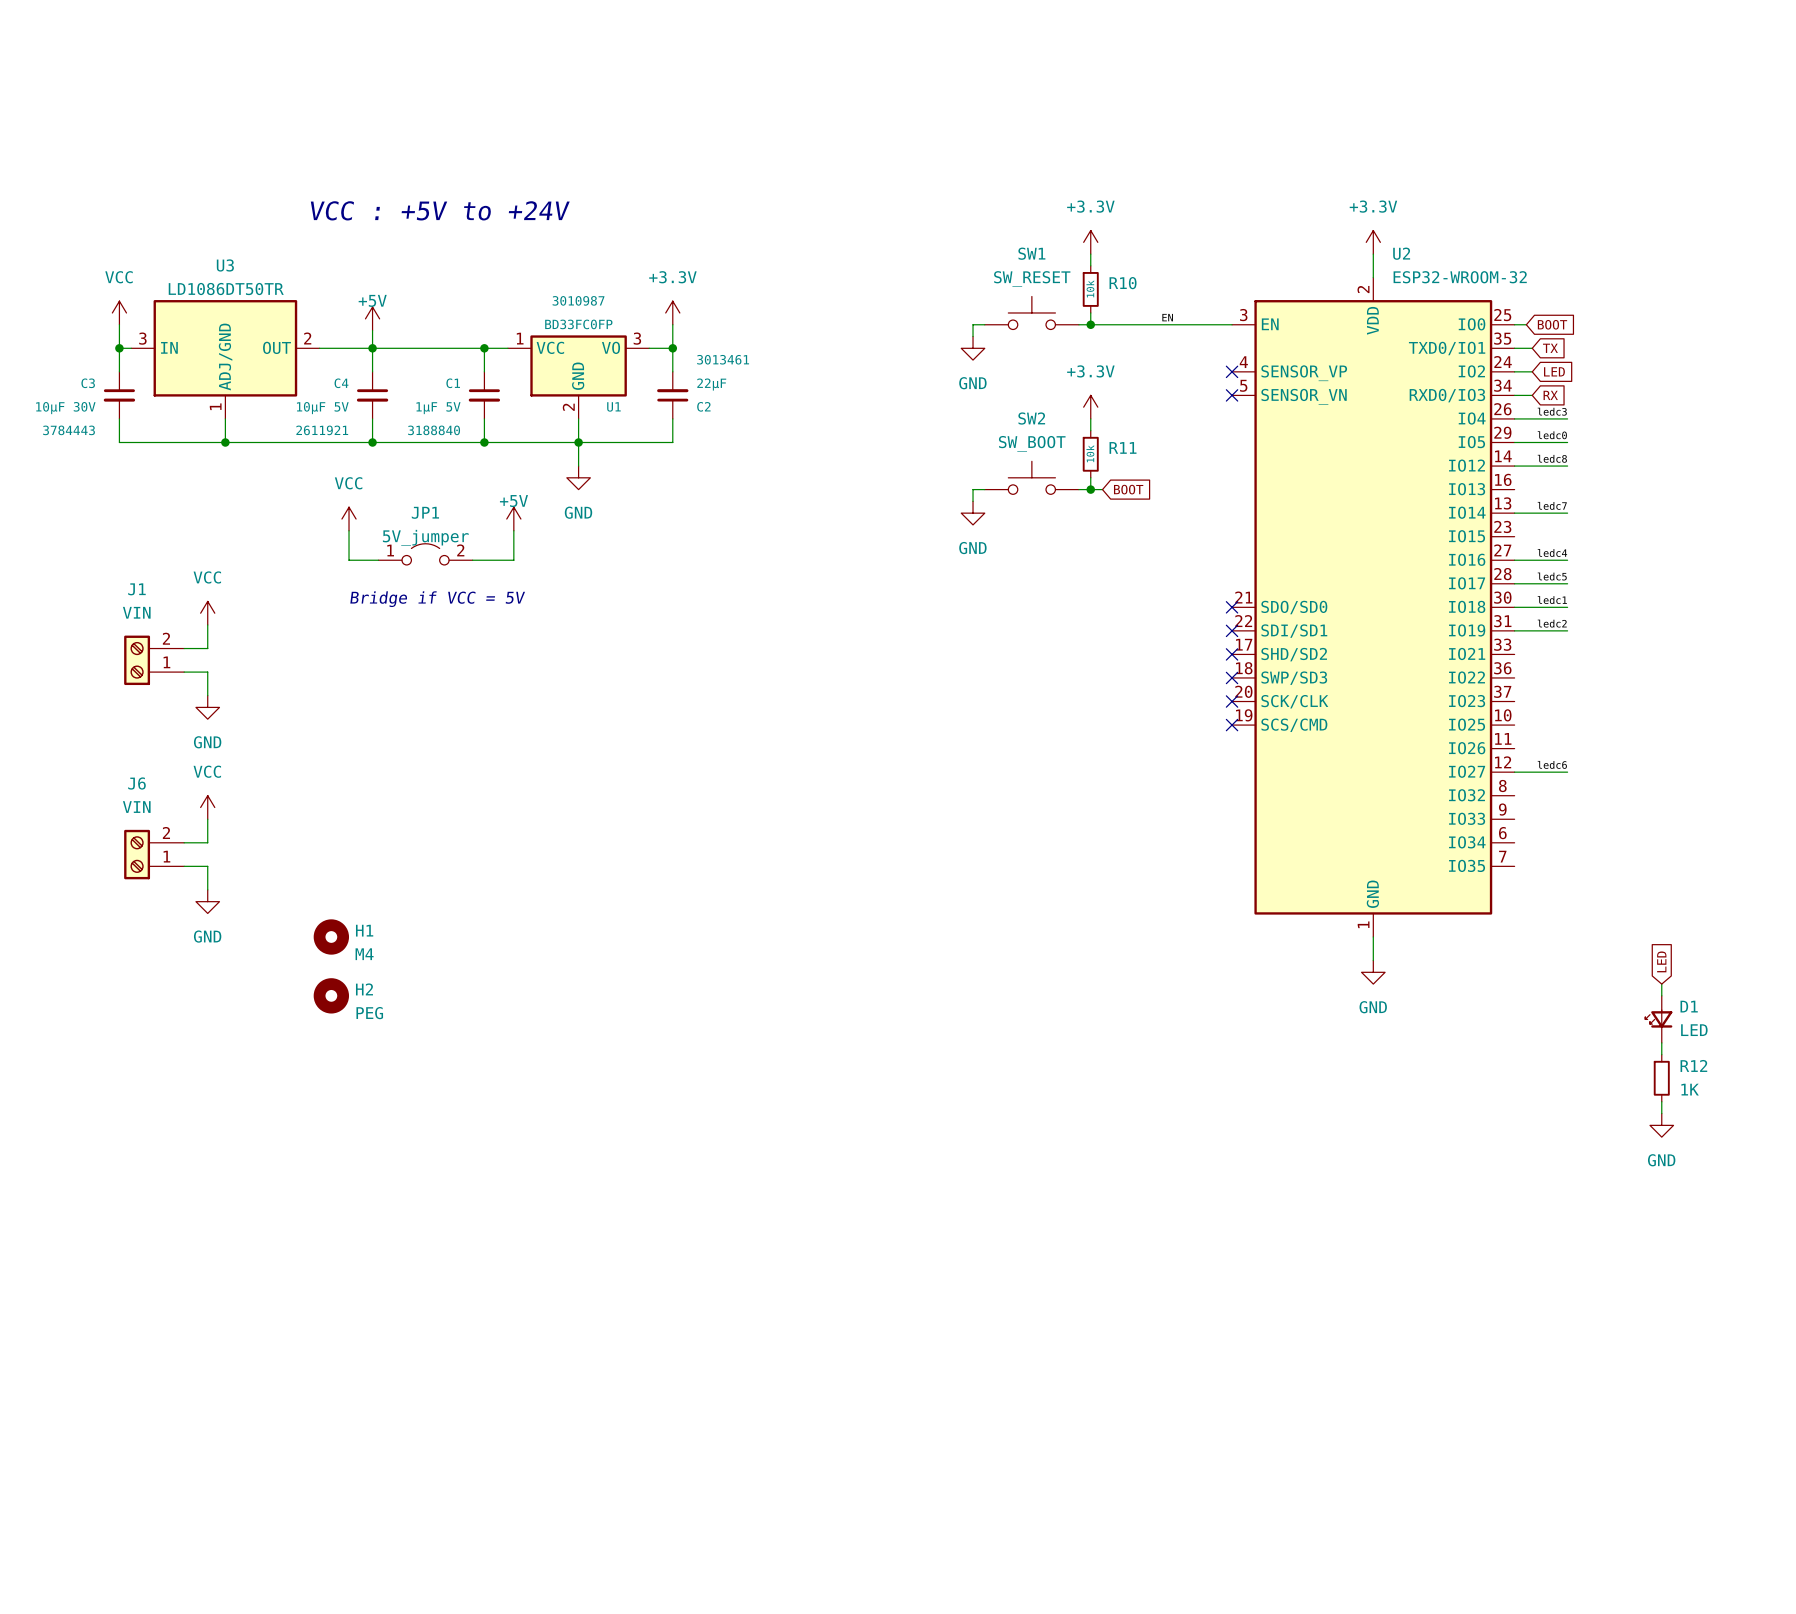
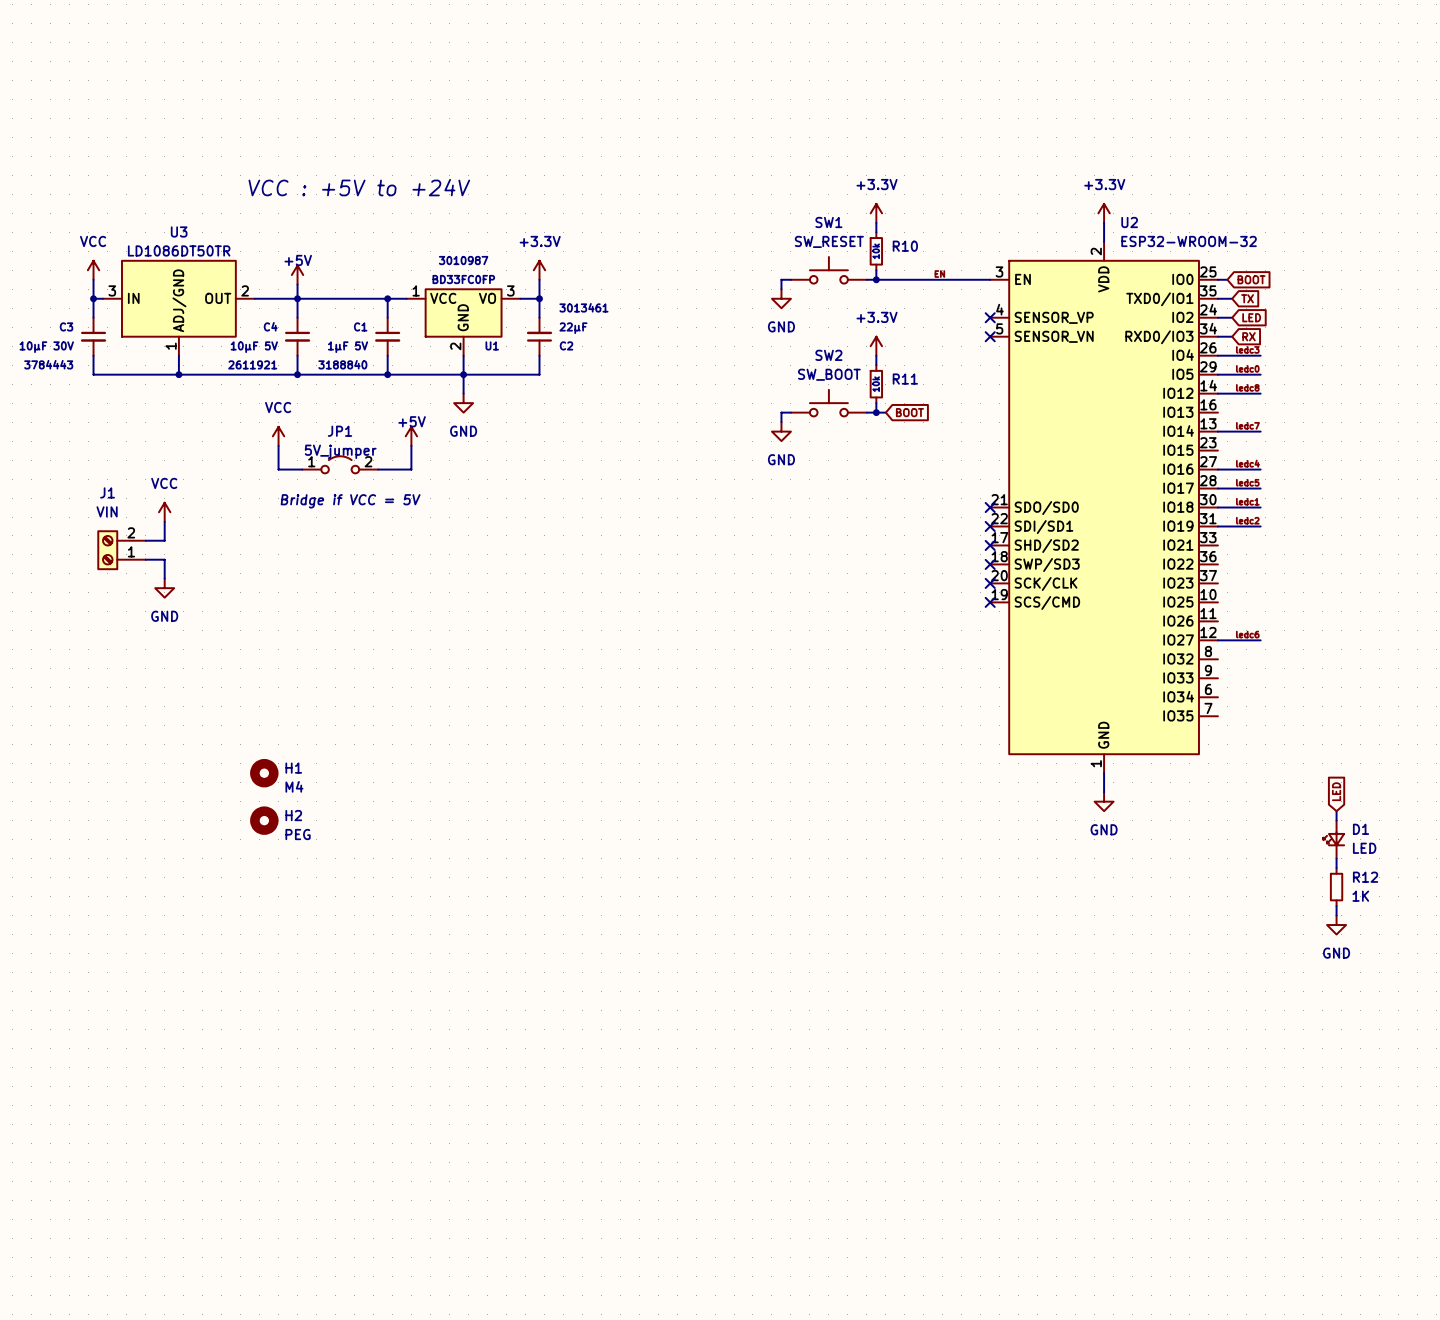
power symbol: VCC (207, 807) -> none
wire: (207, 819) (207, 842) (184, 842) -> none
J6: VIN (154, 854) -> none
wire: (184, 866) (207, 866) (207, 889) -> none
power symbol: GND (207, 901) -> none

